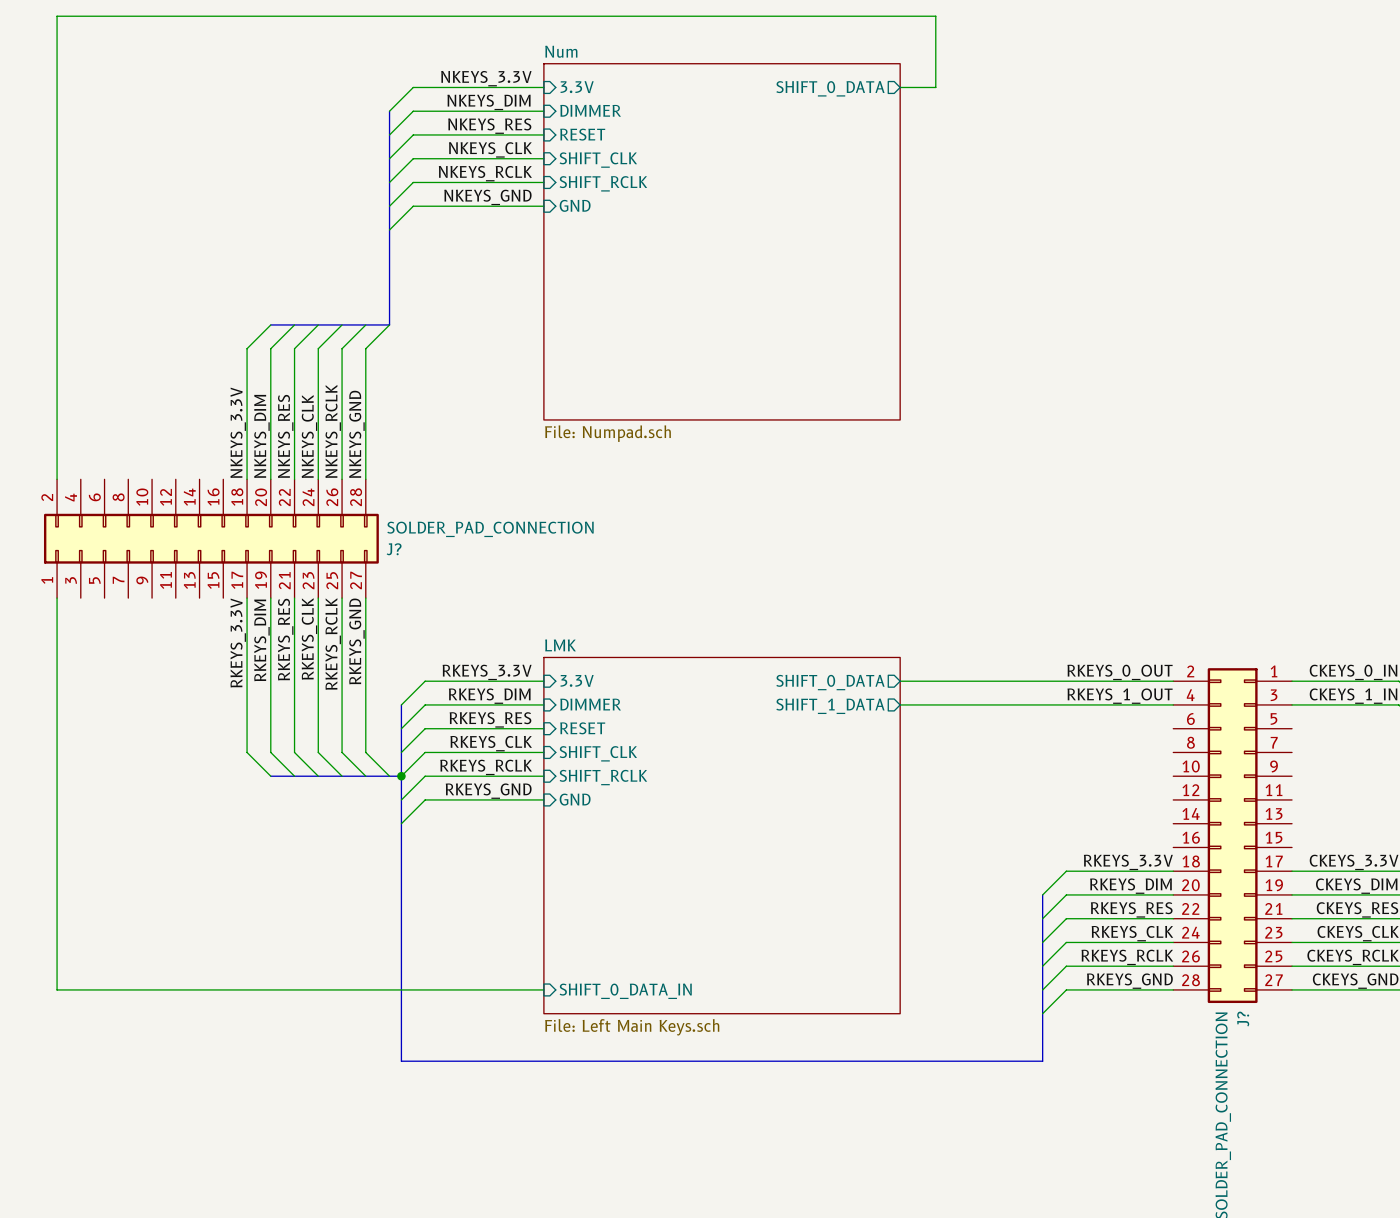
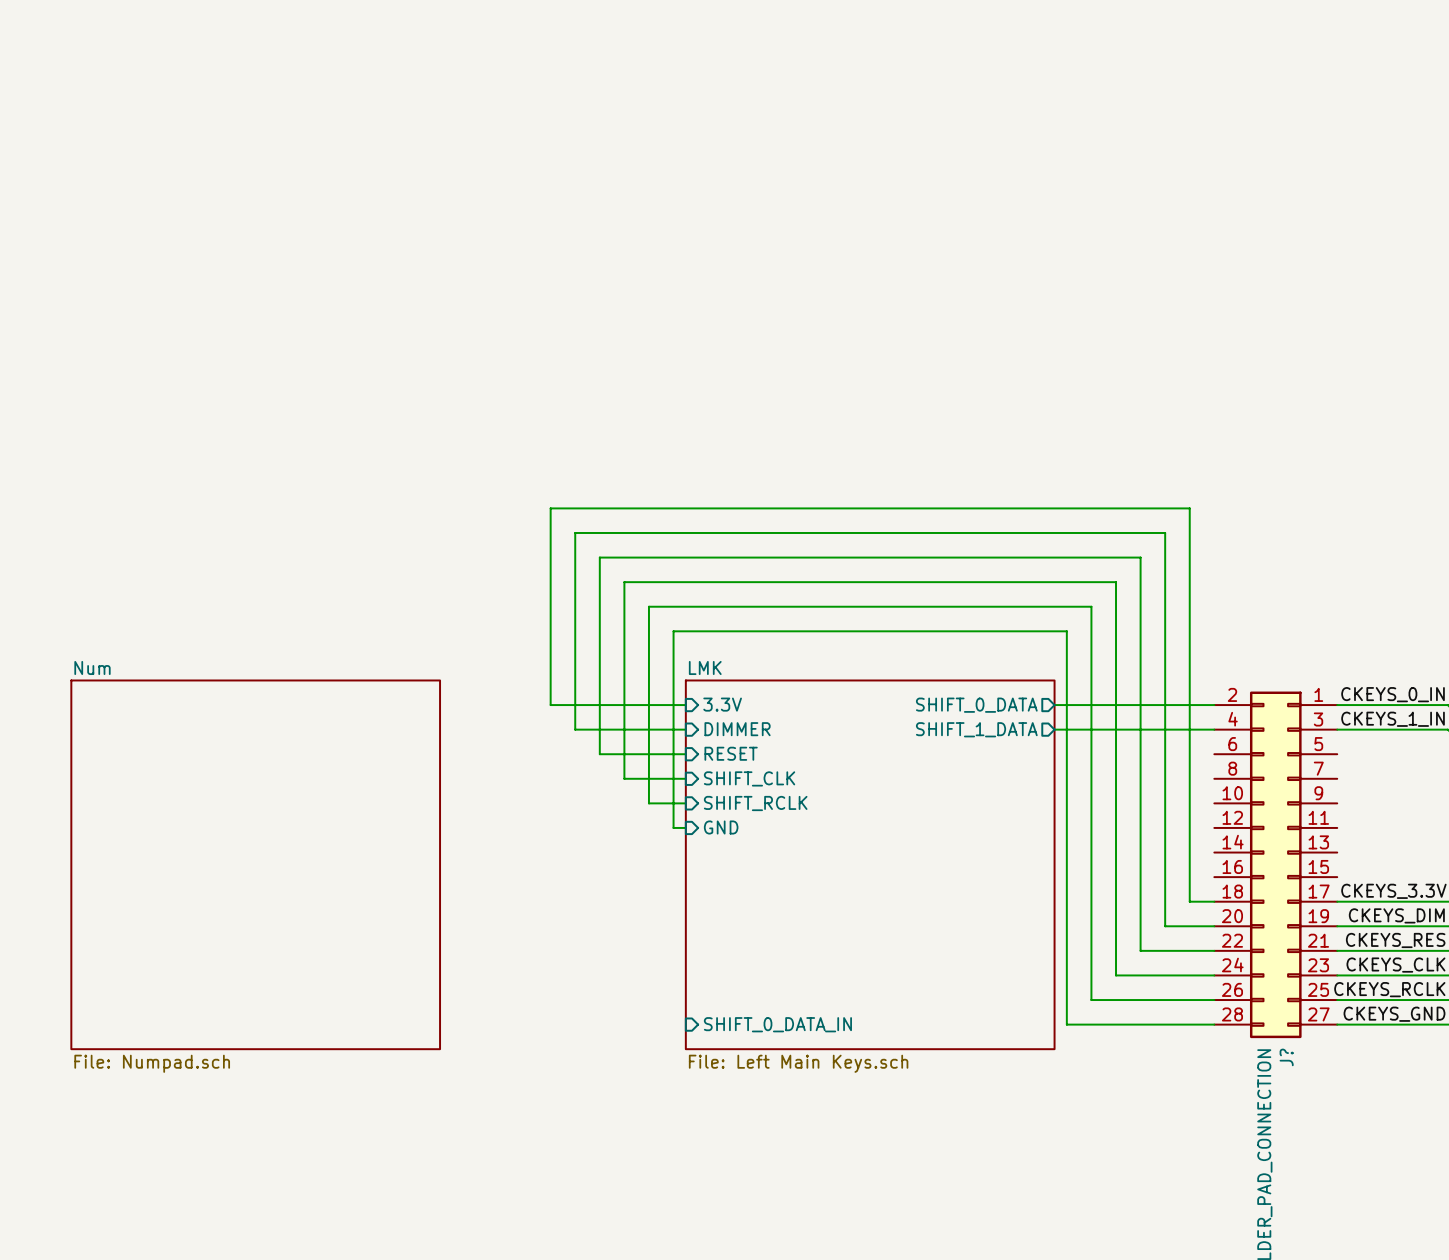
label: NKEYS_3.3V (486, 78) -> none
wire: (543, 87) (413, 87) (389, 111) -> none
sheet pin: 3.3V (577, 87) -> none
wire: (900, 87) (935, 87) (935, 16) (57, 16) (57, 479) -> none
sheet pin: SHIFT_0_DATA (830, 88) -> none
label: NKEYS_DIM (488, 102) -> none
sheet pin: DIMMER (590, 110) -> none
bus: (389, 111) (389, 324) (270, 324) -> none
wire: (543, 111) (413, 111) (389, 134) -> none
label: NKEYS_RES (489, 126) -> none
wire: (543, 134) (413, 134) (389, 158) -> none
sheet pin: RESET (582, 134) -> none
label: NKEYS_CLK (490, 149) -> none
wire: (543, 158) (413, 158) (389, 182) -> none
sheet pin: SHIFT_CLK (598, 160) -> none
label: NKEYS_RCLK (485, 173) -> none
wire: (543, 182) (413, 182) (389, 206) -> none
sheet pin: SHIFT_RCLK (603, 183) -> none
label: NKEYS_GND (487, 197) -> none
sheet pin: GND (575, 205) -> none
wire: (543, 206) (413, 206) (389, 229) -> none
sheet Num: File: Numpad.sch (722, 241) -> none
wire: (270, 324) (247, 348) (247, 479) -> none
wire: (294, 324) (270, 348) (270, 479) -> none
wire: (318, 324) (294, 348) (294, 479) -> none
wire: (342, 324) (318, 348) (318, 479) -> none
wire: (365, 324) (342, 348) (342, 479) -> none
wire: (389, 324) (365, 348) (365, 479) -> none
label: NKEYS_RCLK (333, 431) -> none
label: NKEYS_3.3V (238, 432) -> none
label: NKEYS_GND (356, 434) -> none
label: NKEYS_DIM (261, 436) -> none
label: NKEYS_RES (285, 436) -> none
label: NKEYS_CLK (309, 436) -> none
J?: SOLDER_PAD_CONNECTION (211, 538) -> none
wire: (57, 598) (57, 989) (543, 989) -> none
wire: (247, 598) (247, 752) (270, 776) -> none
wire: (270, 598) (270, 752) (294, 776) -> none
wire: (294, 598) (294, 752) (318, 776) -> none
wire: (318, 598) (318, 752) (342, 776) -> none
wire: (342, 598) (342, 752) (365, 776) -> none
wire: (365, 598) (365, 752) (389, 776) -> none
label: RKEYS_CLK (309, 638) -> none
label: RKEYS_RES (285, 639) -> none
label: RKEYS_DIM (261, 640) -> none
label: RKEYS_GND (356, 641) -> none
label: RKEYS_3.3V (238, 643) -> none
label: RKEYS_RCLK (333, 644) -> none
label: RKEYS_3.3V (487, 672) -> none
label: RKEYS_0_OUT (1120, 672) -> none
sheet pin position: 3.3V (577, 680) -> 3.3V (722, 704)
wire: (532, 681) (425, 681) (401, 704) -> none
wire: none -> (562, 705) (685, 705)
wire: (900, 681) (1018, 681) -> none
sheet pin position: SHIFT_0_DATA (830, 682) -> SHIFT_0_DATA (976, 705)
label: RKEYS_DIM (489, 696) -> none
label: RKEYS_1_OUT (1120, 696) -> none
bus: (401, 704) (401, 1061) (1042, 1061) (1042, 894) -> none
wire: (543, 704) (425, 704) (401, 728) -> none
sheet pin position: DIMMER (590, 704) -> DIMMER (737, 729)
wire: (900, 704) (1018, 704) -> none
sheet pin position: SHIFT_1_DATA (830, 706) -> SHIFT_1_DATA (976, 729)
label: RKEYS_RES (490, 719) -> none
wire: (543, 728) (425, 728) (401, 752) -> none
sheet pin position: RESET (582, 728) -> RESET (731, 753)
label: RKEYS_CLK (491, 743) -> none
wire: (543, 752) (425, 752) (401, 776) -> none
sheet pin position: SHIFT_CLK (598, 753) -> SHIFT_CLK (749, 778)
label: RKEYS_RCLK (486, 767) -> none
bus: (270, 776) (401, 776) -> none
junction: (401, 776) -> none
wire: (543, 776) (425, 776) (401, 799) -> none
sheet pin position: SHIFT_RCLK (603, 777) -> SHIFT_RCLK (755, 803)
label: RKEYS_GND (488, 791) -> none
wire: (543, 799) (425, 799) (401, 823) -> none
sheet pin position: GND (575, 799) -> GND (721, 827)
sheet Num: none -> File: Numpad.sch (255, 864)
sheet LMK position: (722, 835) -> (870, 864)
label: RKEYS_3.3V (1128, 862) -> none
wire: (1149, 871) (1066, 871) (1042, 894) -> (1189, 901) (1189, 508) (550, 508) (550, 705)
label: RKEYS_DIM (1130, 886) -> none
wire: (1125, 894) (1066, 894) (1042, 918) -> (1165, 926) (1165, 532) (575, 532) (575, 729) (685, 729)
label: RKEYS_RES (1131, 909) -> none
wire: (1102, 918) (1066, 918) (1042, 942) -> (1140, 950) (1140, 557) (599, 557) (599, 754) (685, 754)
label: RKEYS_CLK (1132, 933) -> none
wire: (1078, 942) (1066, 942) (1042, 966) -> (1116, 975) (1116, 582) (624, 582) (624, 778) (685, 778)
label: RKEYS_RCLK (1127, 957) -> none
wire: (1066, 966) (1042, 989) -> (1103, 1000) (1091, 1000) (1091, 606) (648, 606) (648, 803) (685, 803)
label: RKEYS_GND (1129, 981) -> none
wire: (1066, 989) (1042, 1013) -> (1103, 1024) (1066, 1024) (1066, 631) (673, 631) (673, 827) (685, 827)
sheet pin position: SHIFT_0_DATA_IN (625, 991) -> SHIFT_0_DATA_IN (777, 1024)

